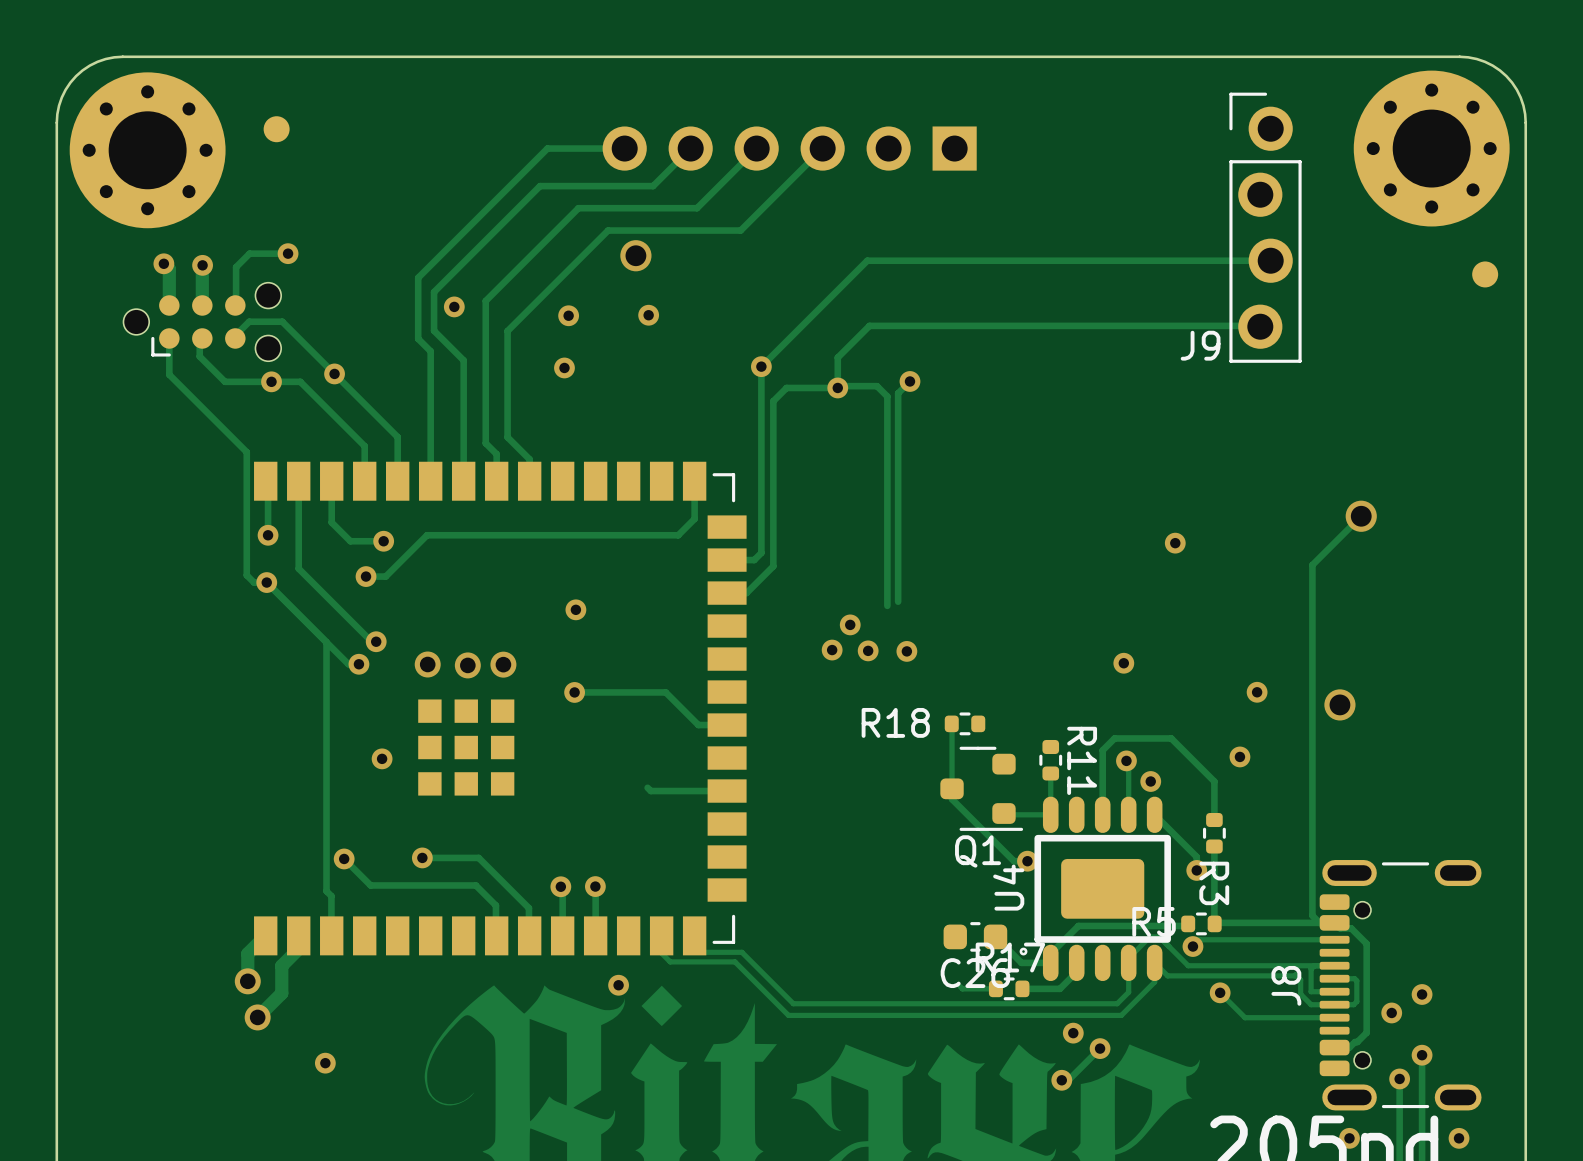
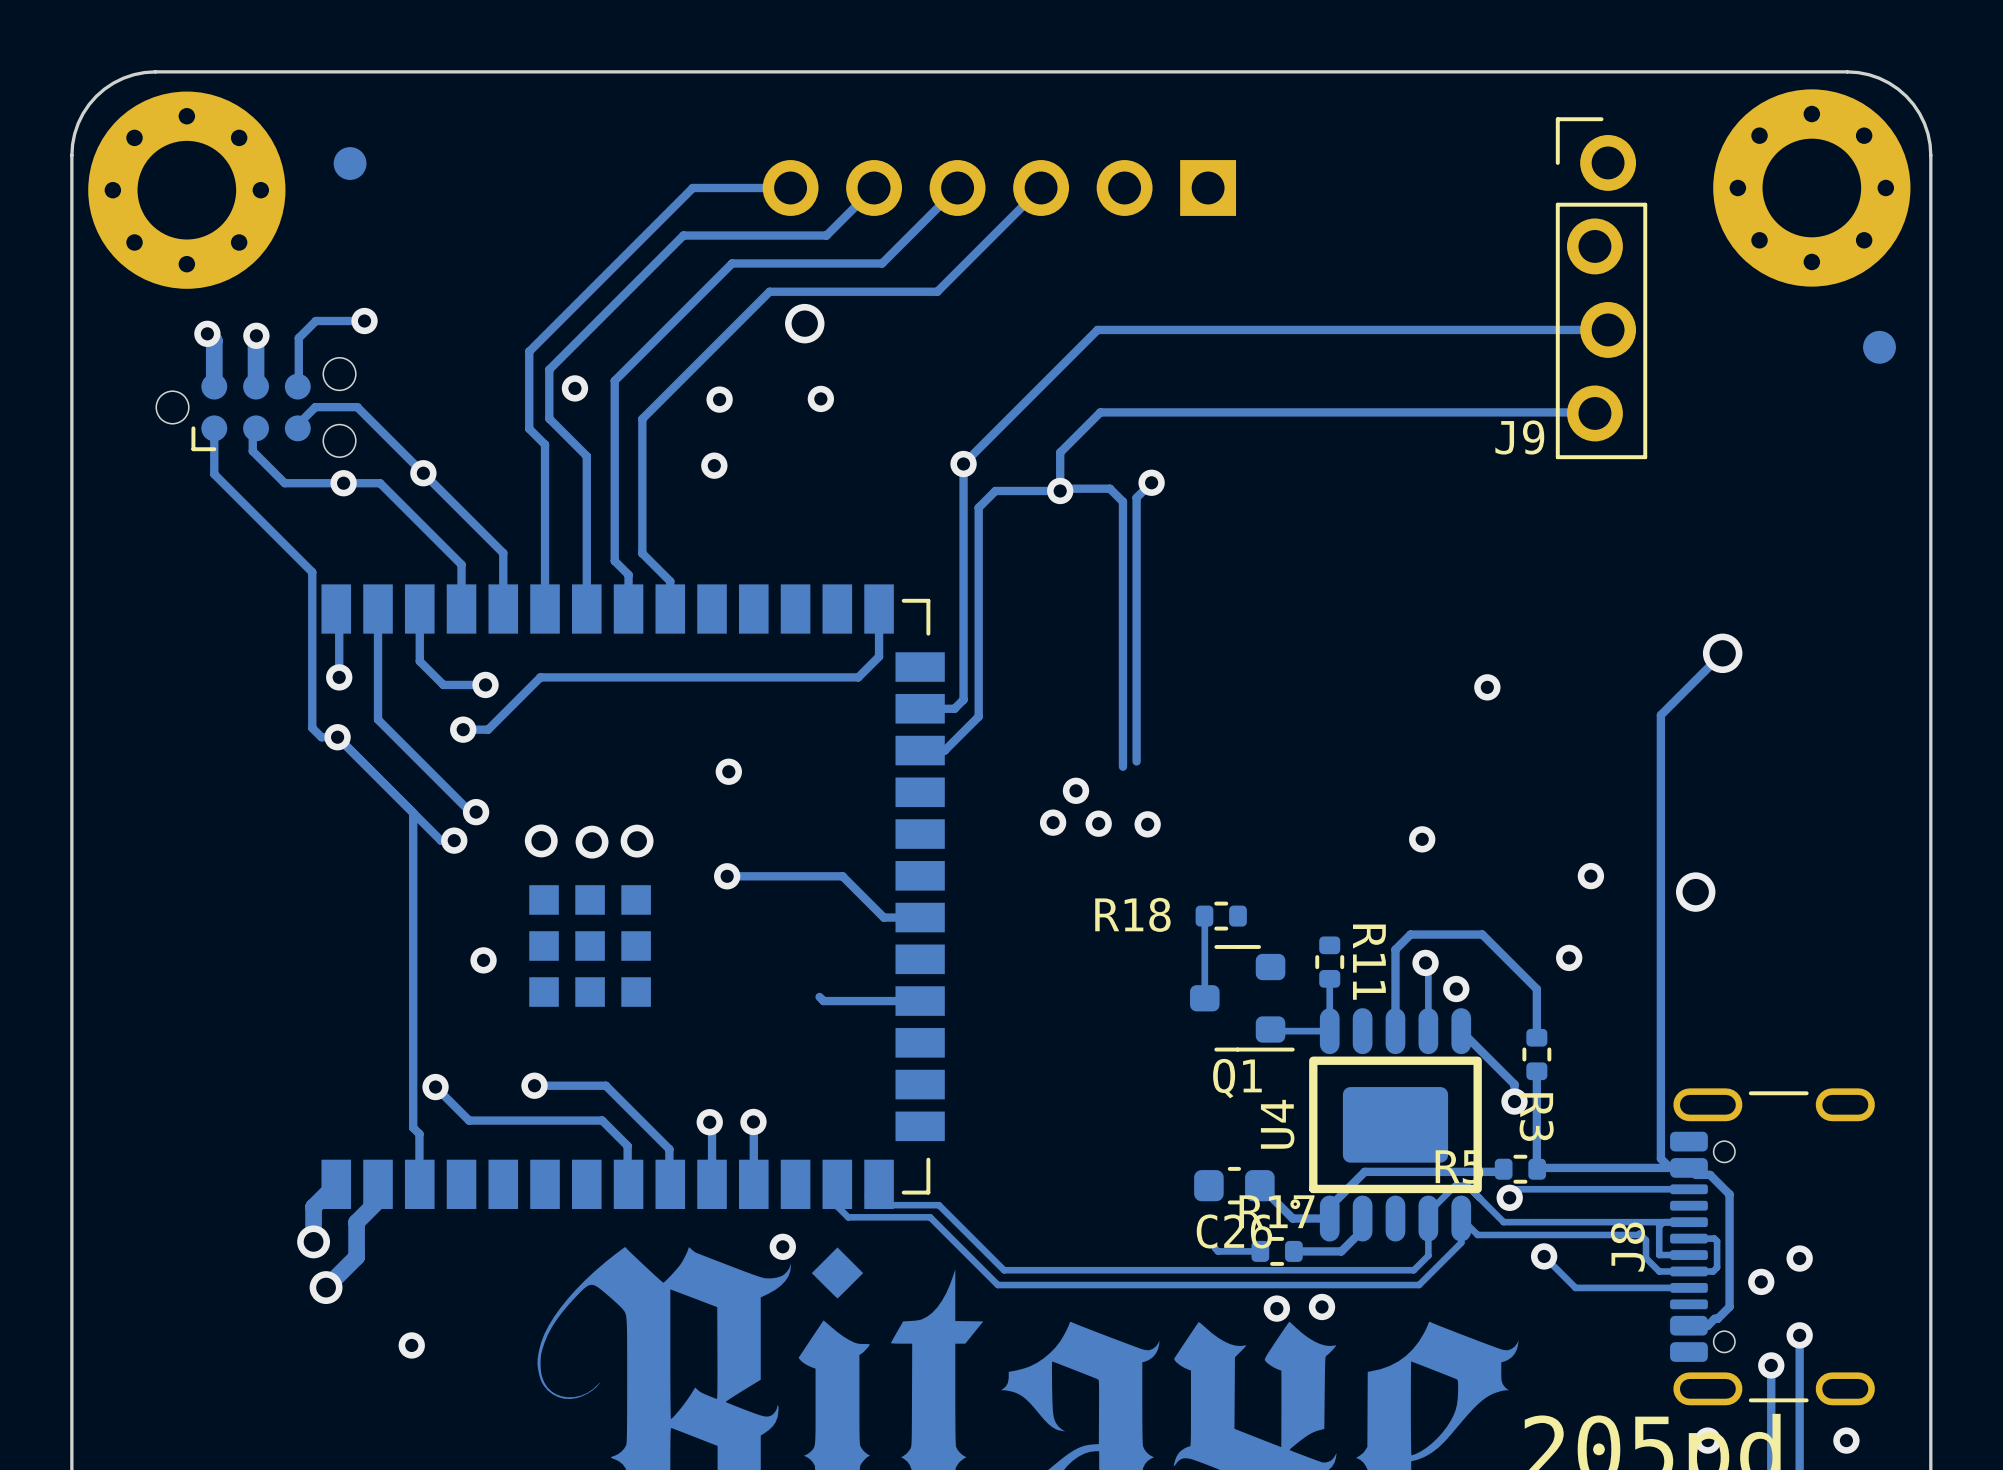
track: (952, 788) (952, 799) (1014, 861) (1027, 861) -> none
via: (1027, 861) -> none
via: none -> (1322, 1306)
via: (1073, 1033) -> none
via: none -> (1276, 1308)
track: (1100, 1048) (1068, 1080) (1061, 1080) -> none
via: (1100, 1048) -> none
via: (1061, 1080) -> none

